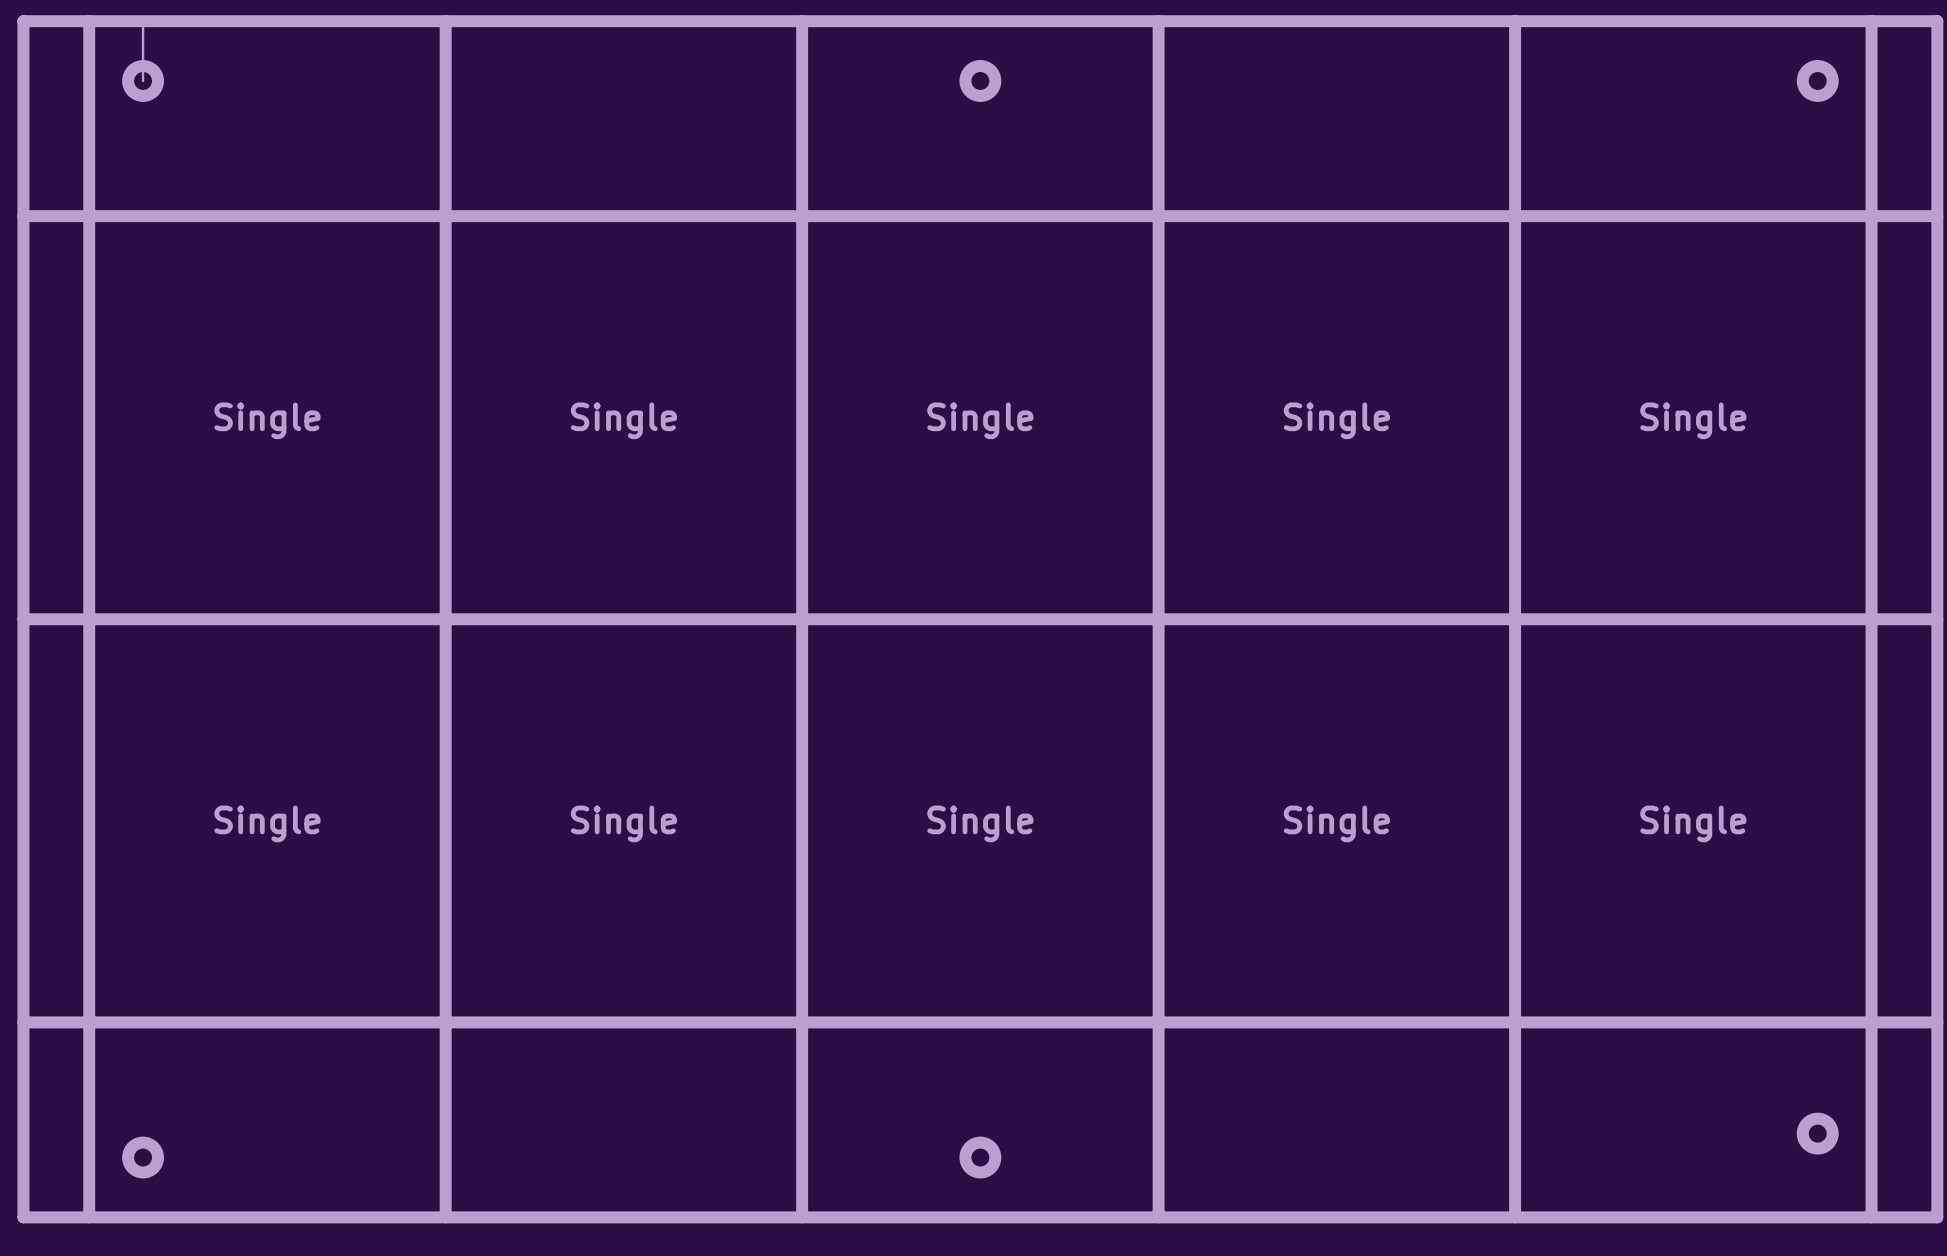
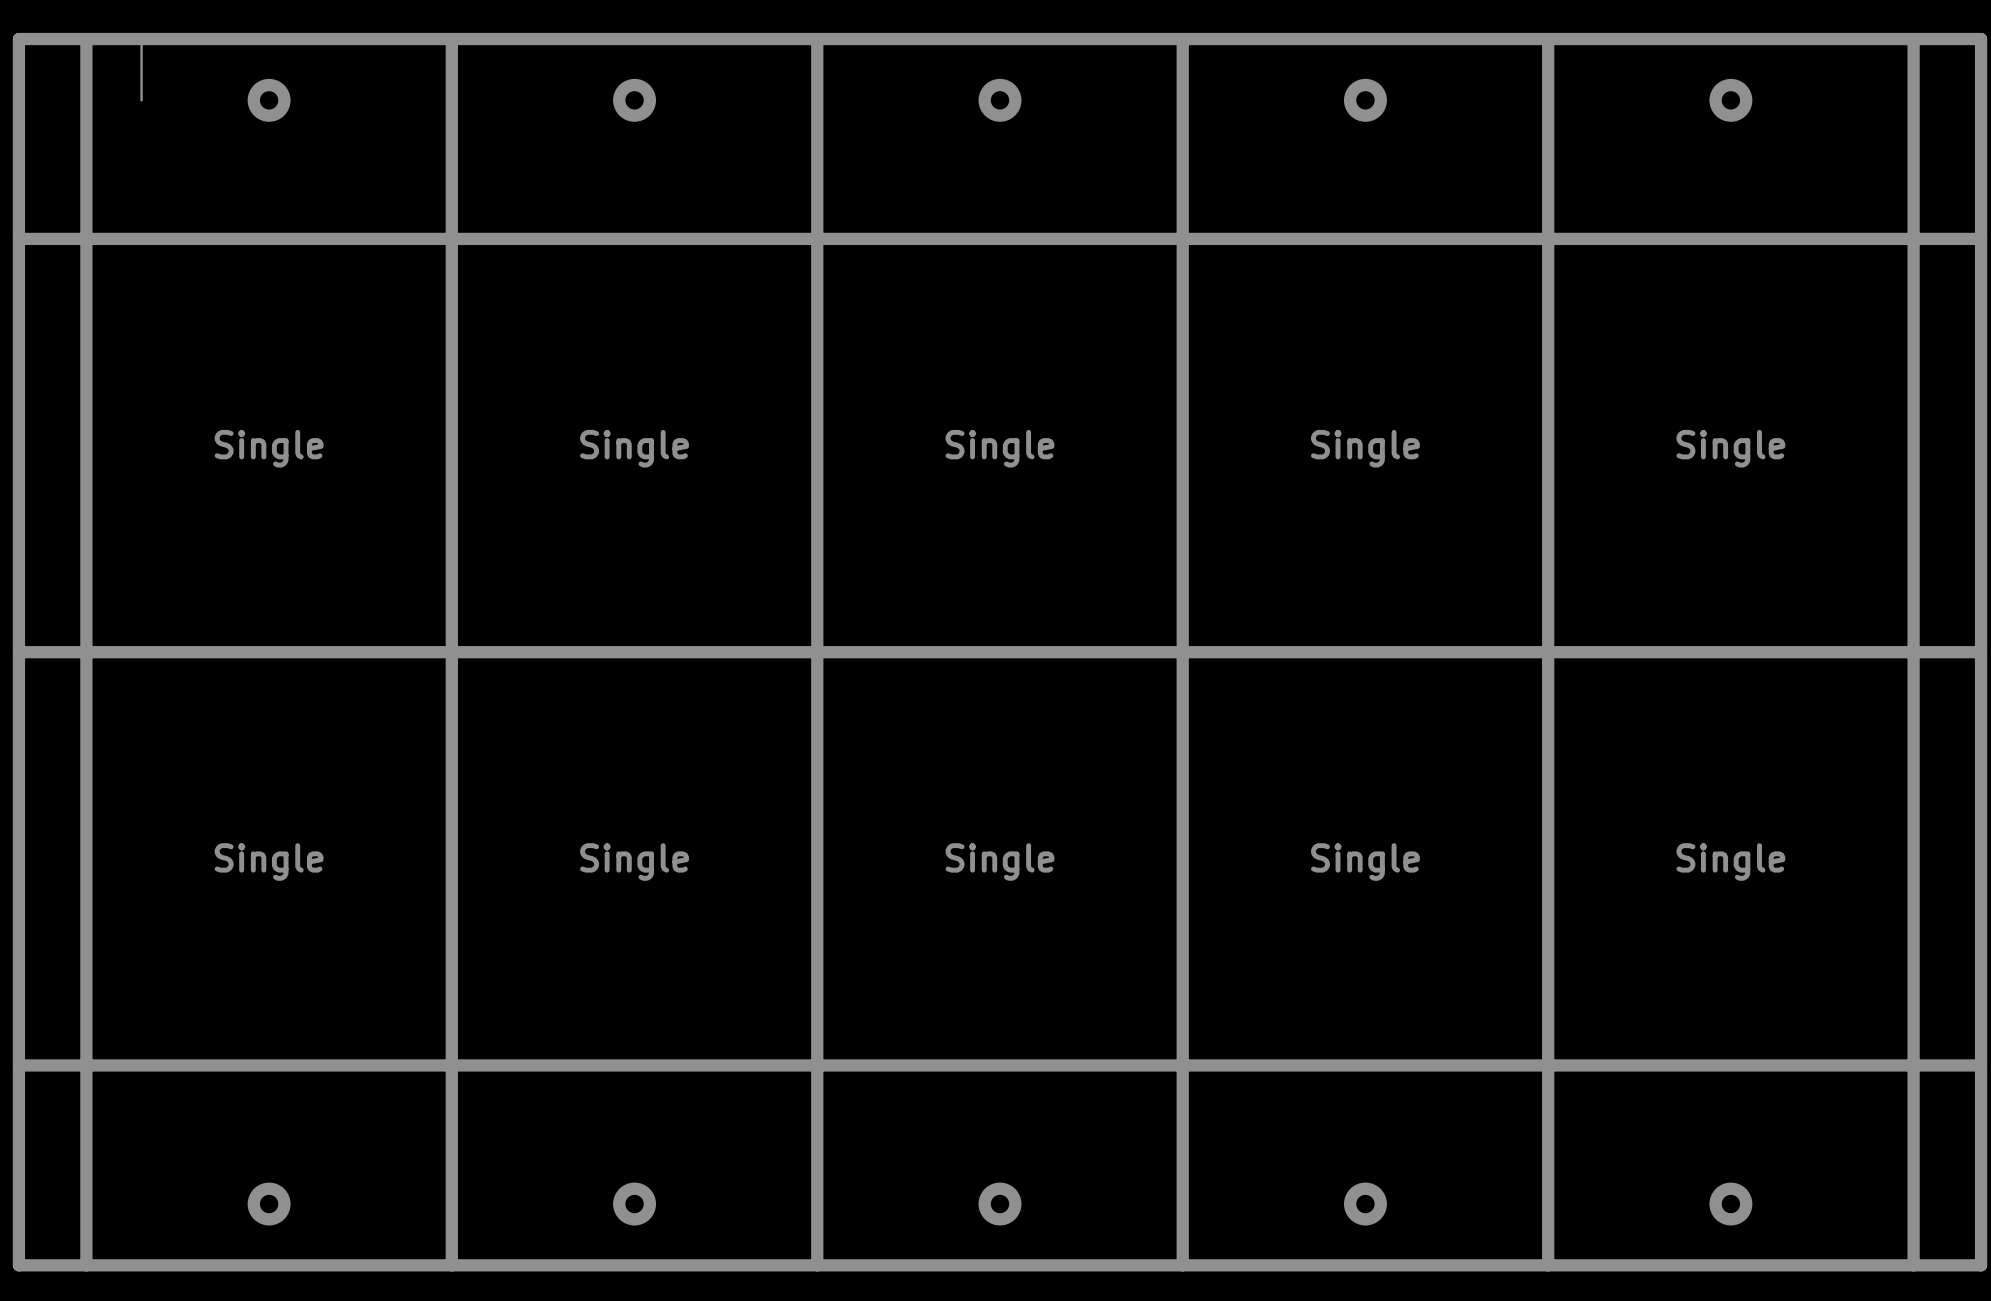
drawing: none -> [613, 78, 657, 122]
drawing: none -> [1343, 78, 1387, 122]
drawing position: (143, 80) -> (269, 100)
drawing position: (1817, 80) -> (1730, 100)
drawing position: (1817, 1133) -> (1730, 1204)
drawing: none -> [613, 1182, 657, 1226]
drawing: none -> [1343, 1182, 1387, 1226]
drawing position: (143, 1157) -> (269, 1204)

